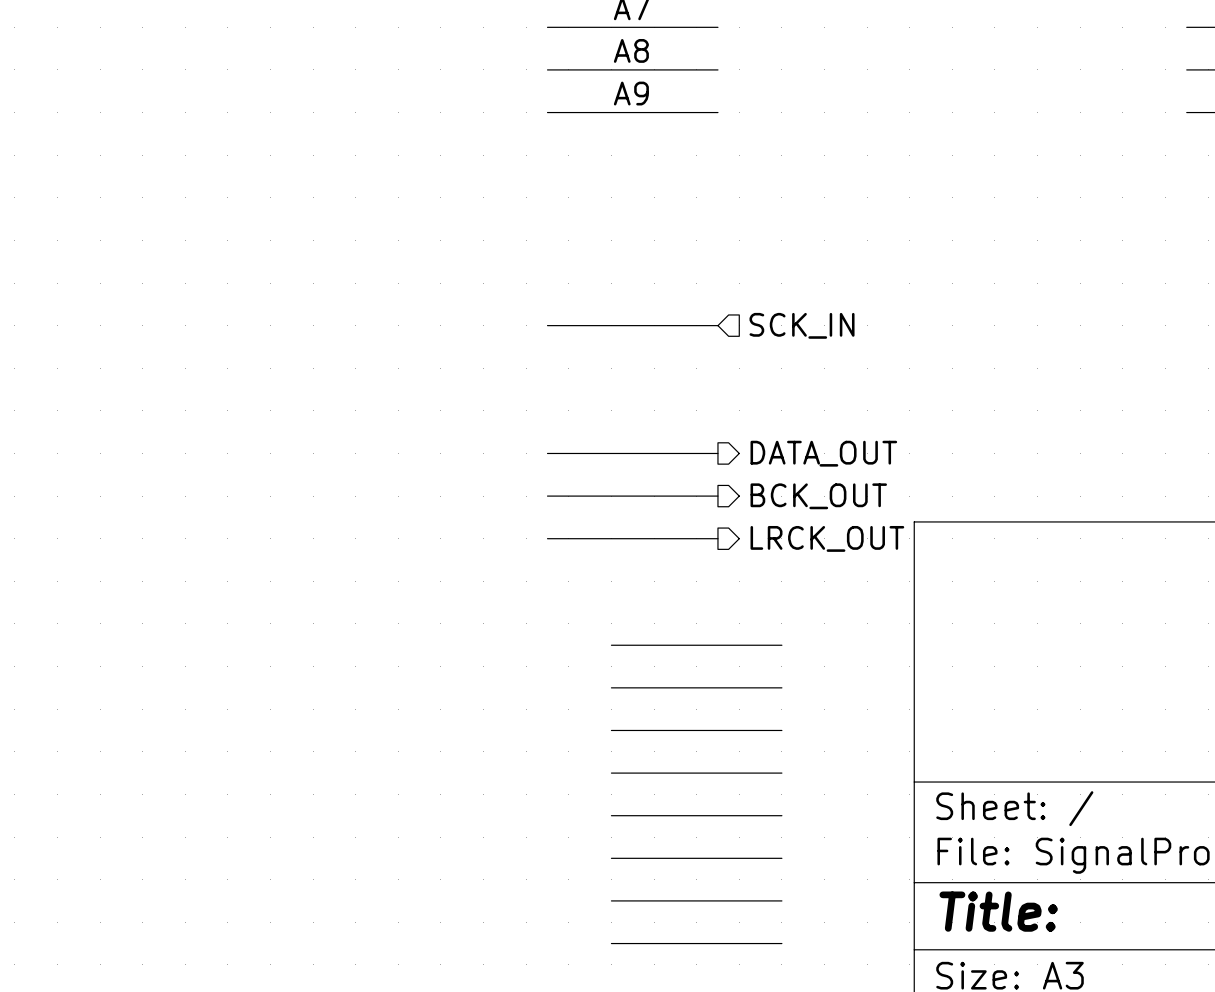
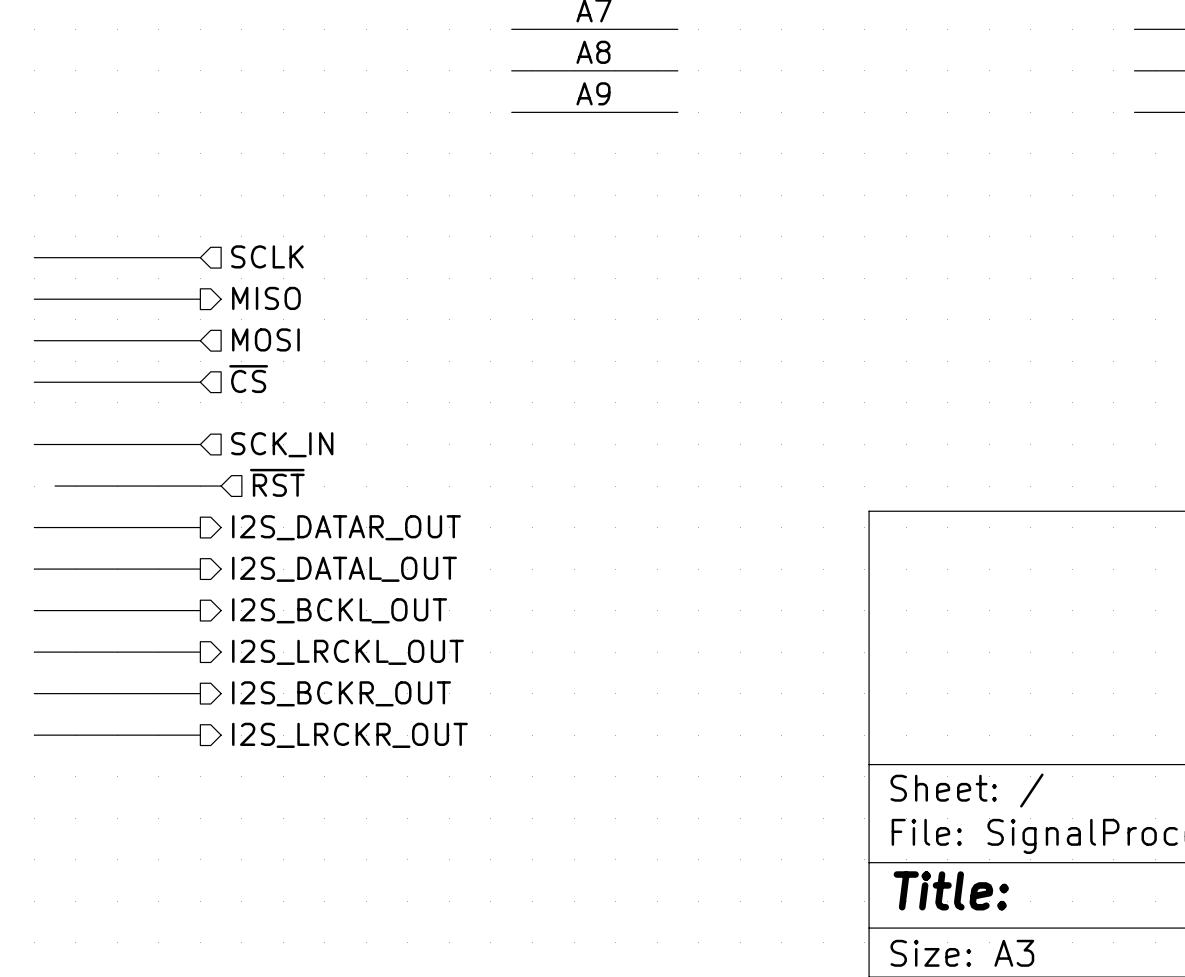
hierarchical label: none -> SCLK (267, 256)
wire: none -> (34, 257) (200, 257)
hierarchical label: none -> MISO (266, 298)
wire: none -> (34, 299) (200, 299)
wire: (547, 325) (717, 325) -> none
hierarchical label: SCK_IN (802, 325) -> none
wire: none -> (34, 340) (200, 340)
hierarchical label: none -> MOSI (265, 339)
hierarchical label: none -> ~{CS} (248, 379)
wire: none -> (34, 382) (200, 382)
wire: none -> (34, 444) (200, 444)
hierarchical label: none -> SCK_IN (282, 444)
wire: (547, 453) (717, 453) -> none
hierarchical label: DATA_OUT (823, 453) -> none
hierarchical label: none -> ~{RST} (277, 482)
wire: none -> (55, 486) (221, 486)
wire: (547, 496) (717, 496) -> none
hierarchical label: BCK_OUT (818, 496) -> none
wire: none -> (34, 527) (200, 527)
hierarchical label: none -> I2S_DATAR_OUT (346, 527)
wire: (547, 538) (717, 538) -> none
hierarchical label: LRCK_OUT (827, 538) -> none
wire: none -> (34, 569) (200, 569)
hierarchical label: none -> I2S_DATAL_OUT (344, 569)
wire: none -> (34, 610) (200, 610)
hierarchical label: none -> I2S_BCKL_OUT (339, 610)
wire: (611, 645) (781, 645) -> none
wire: none -> (34, 652) (200, 652)
hierarchical label: none -> I2S_LRCKL_OUT (347, 652)
wire: (611, 687) (781, 687) -> none
wire: none -> (34, 693) (200, 693)
hierarchical label: none -> I2S_BCKR_OUT (341, 693)
wire: (611, 730) (781, 730) -> none
wire: none -> (34, 735) (200, 735)
hierarchical label: none -> I2S_LRCKR_OUT (349, 735)
wire: (611, 773) (781, 773) -> none
wire: (611, 815) (781, 815) -> none
wire: (611, 858) (781, 858) -> none
wire: (611, 900) (781, 900) -> none
wire: (611, 943) (781, 943) -> none

